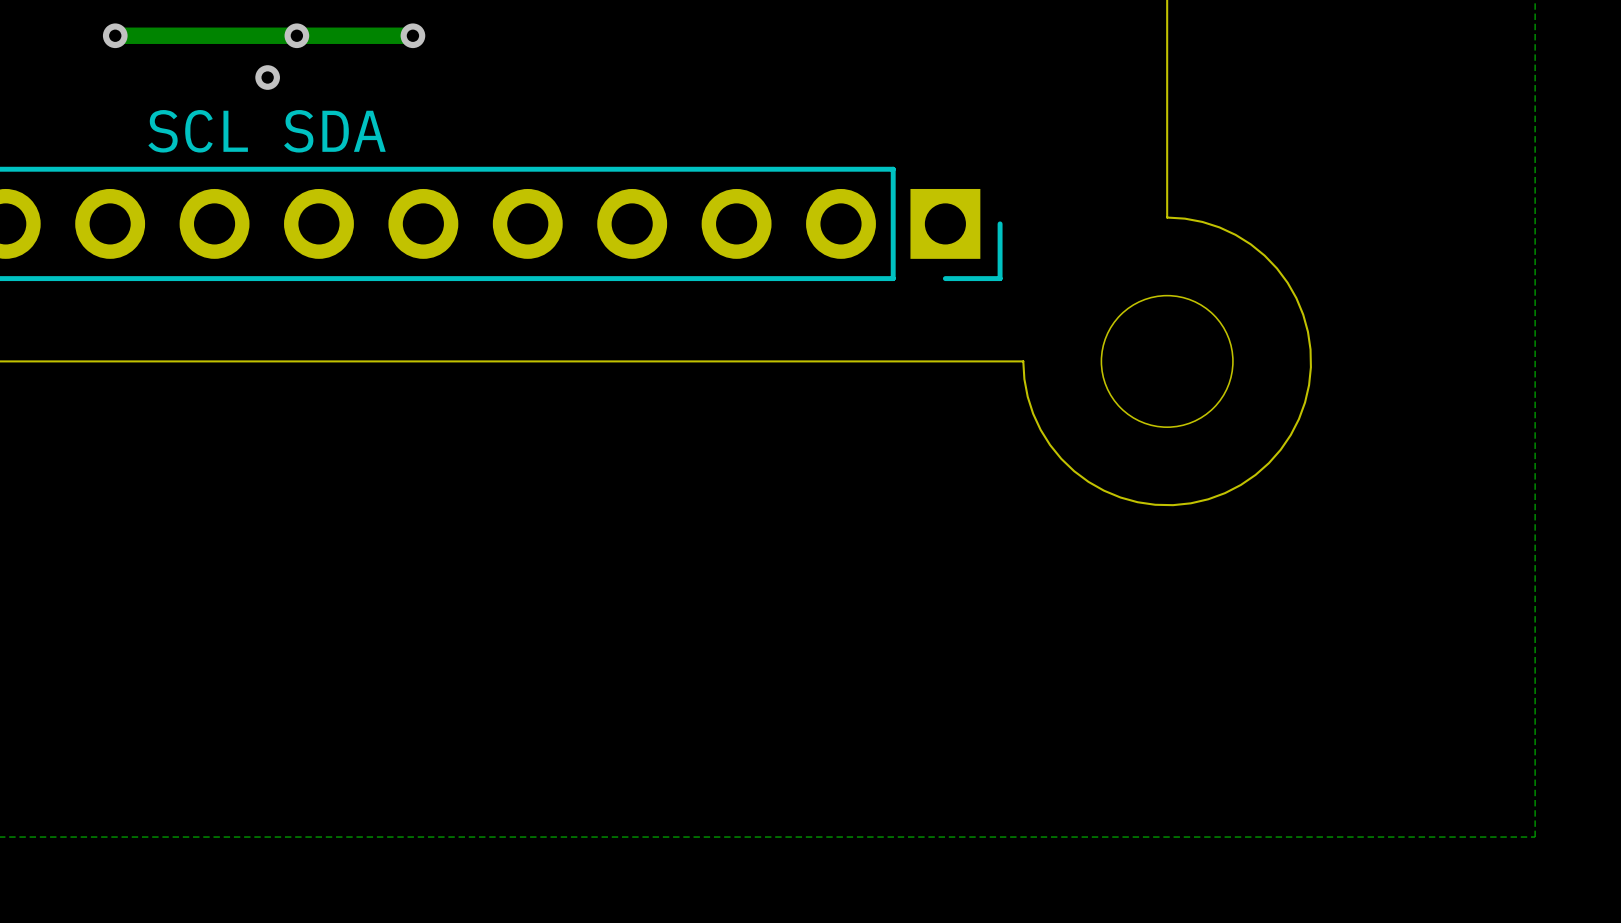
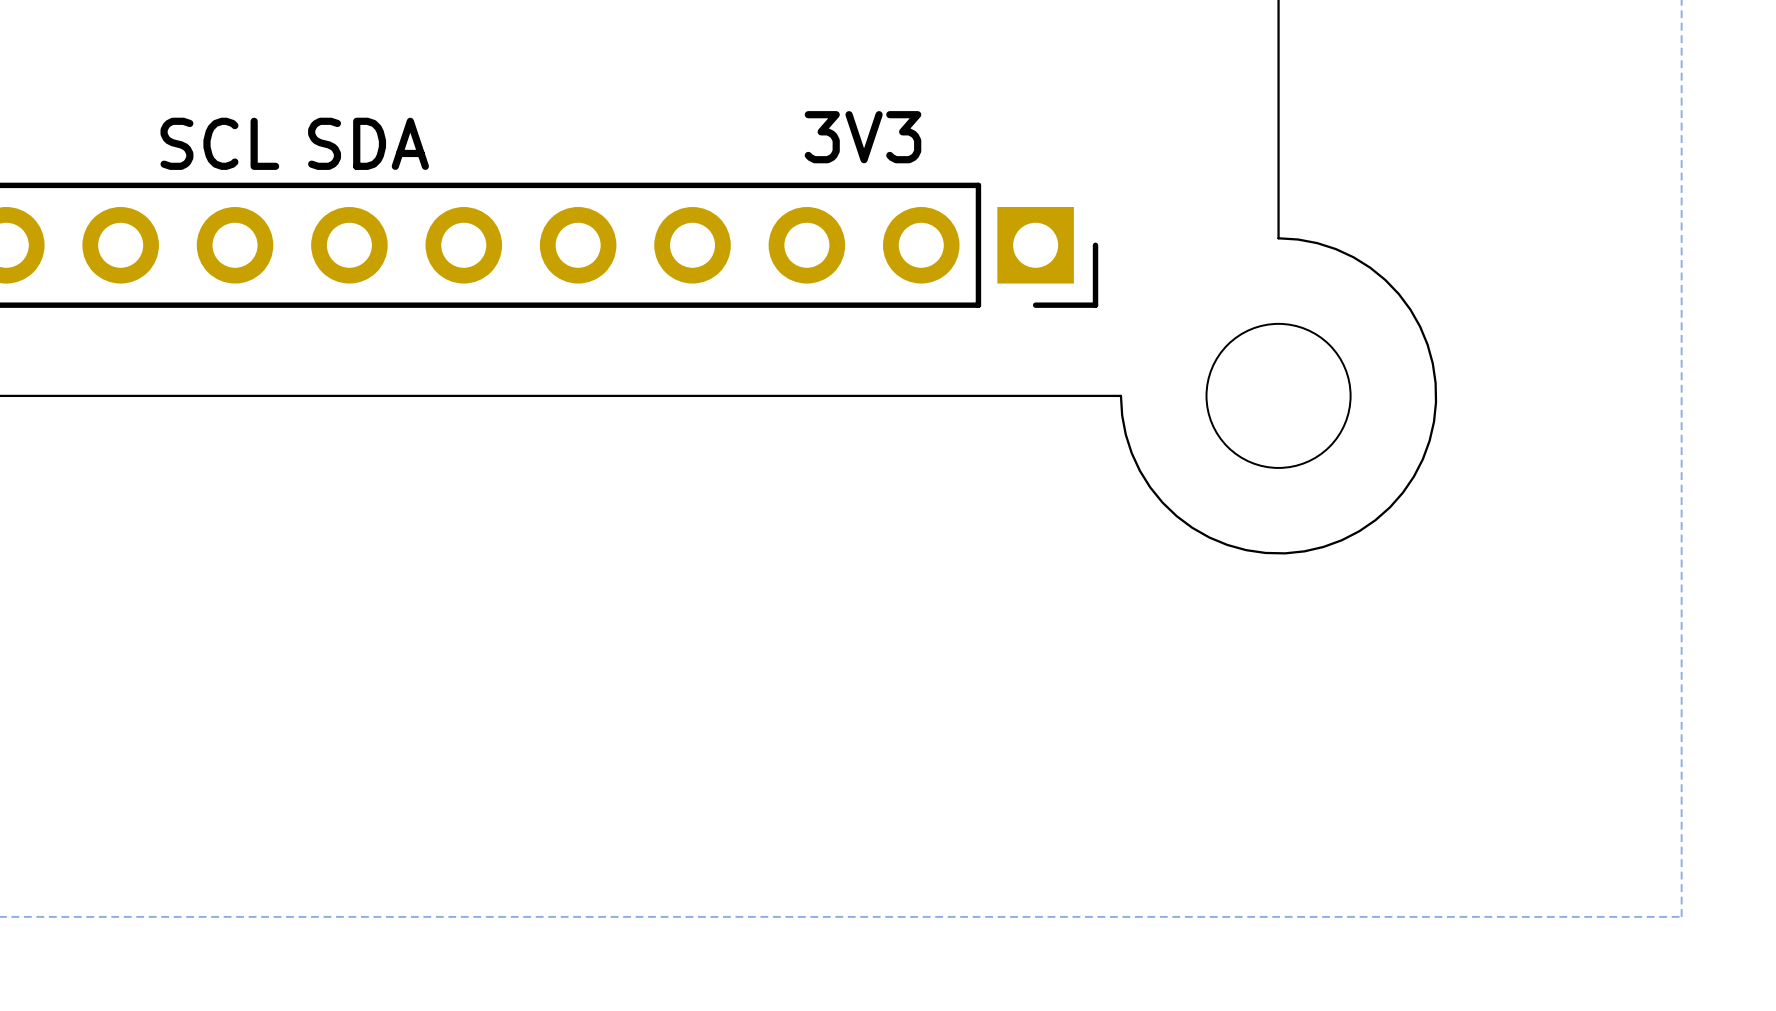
via: (115, 35) -> none
via: (296, 35) -> none
track: (412, 35) (115, 35) -> none
via: (412, 35) -> none
via: (267, 77) -> none
text: none -> 3V3 (863, 137)

